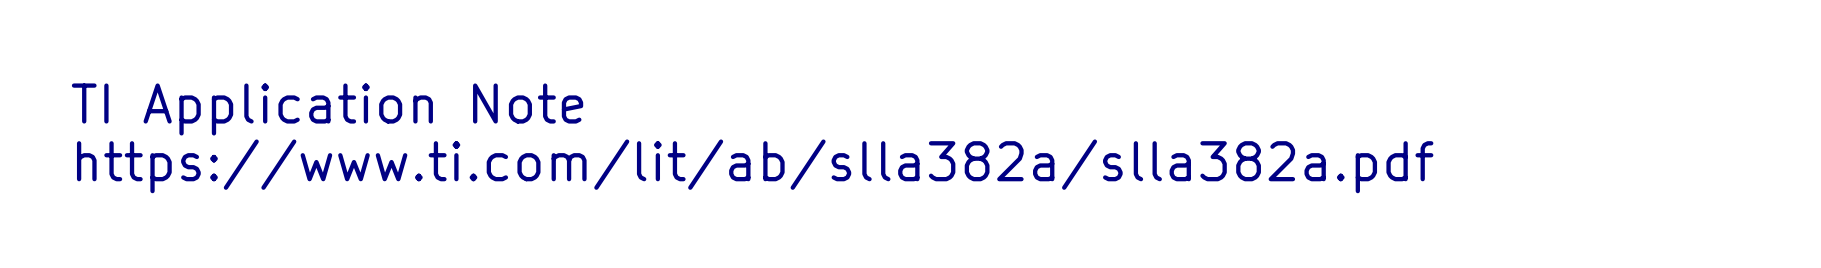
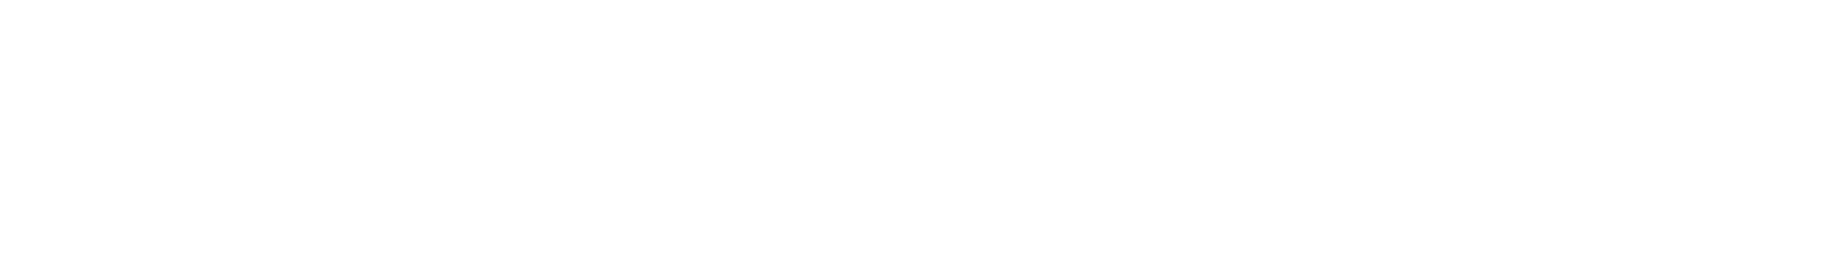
text: TI Application Note (327, 109) -> none
text: https://www.ti.com/lit/ab/slla382a/slla382a.pdf (755, 166) -> none

